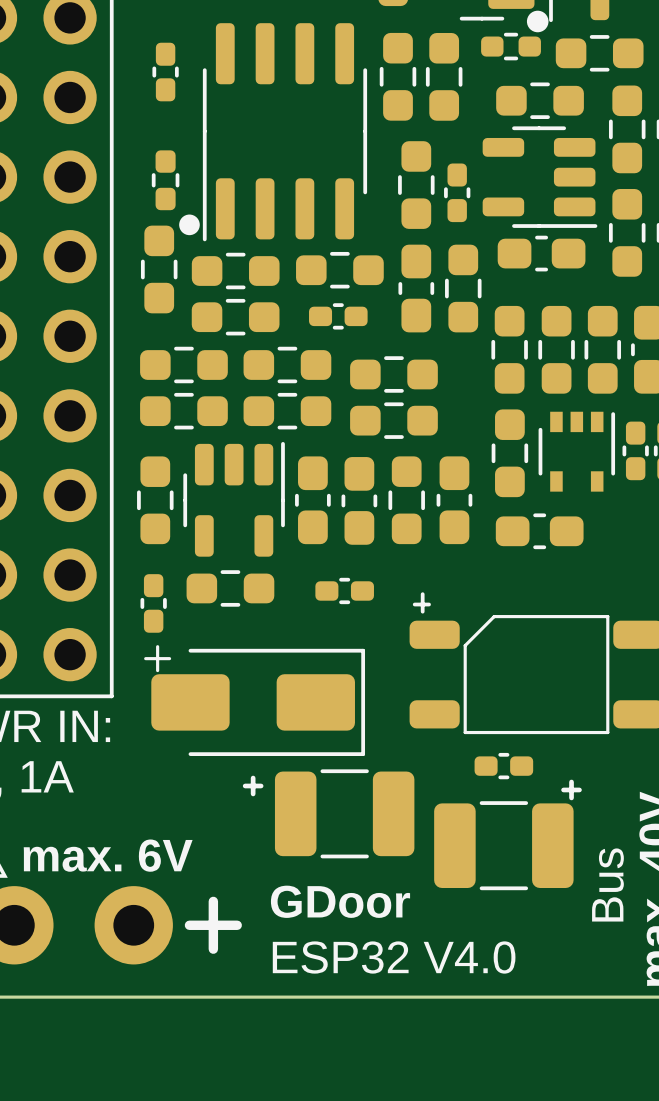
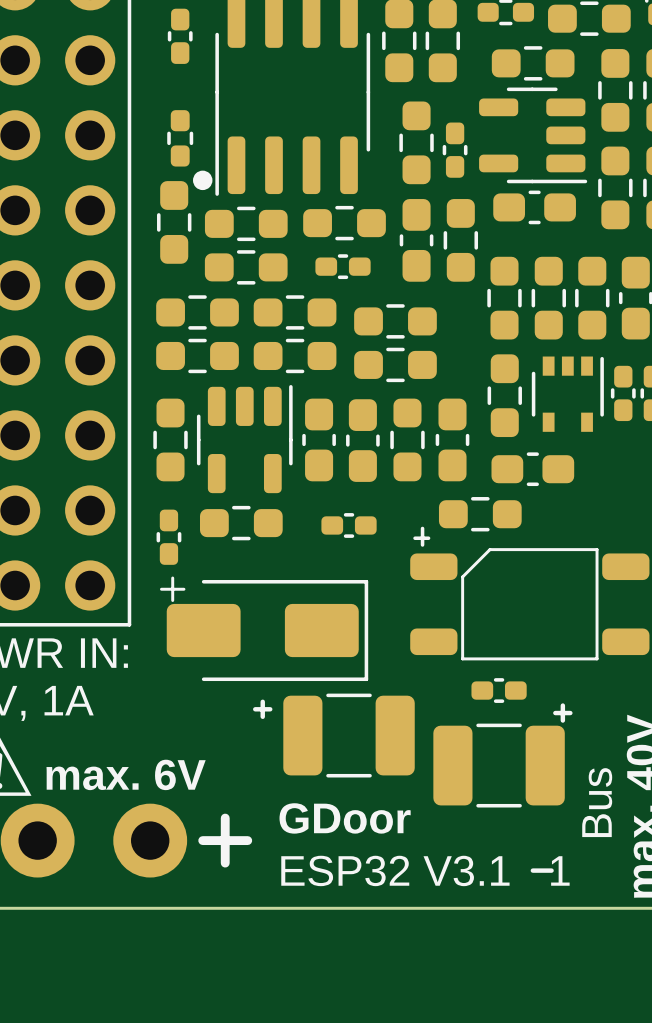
part: none -> (480, 514)
text: ESP32 V4.0 (394, 957) -> ESP32 V3.1 (395, 870)
line: none -> (532, 870) (551, 870)
text: none -> 1 (560, 870)

